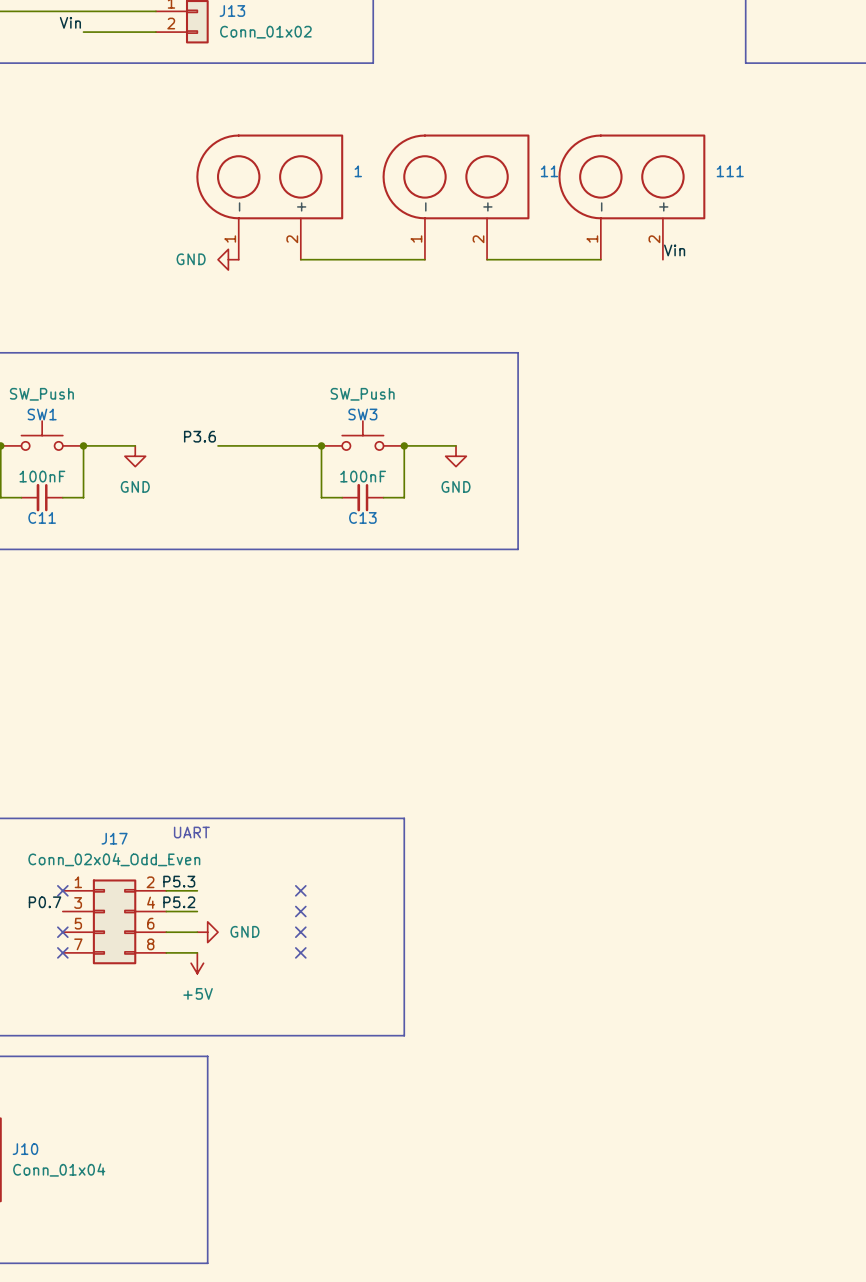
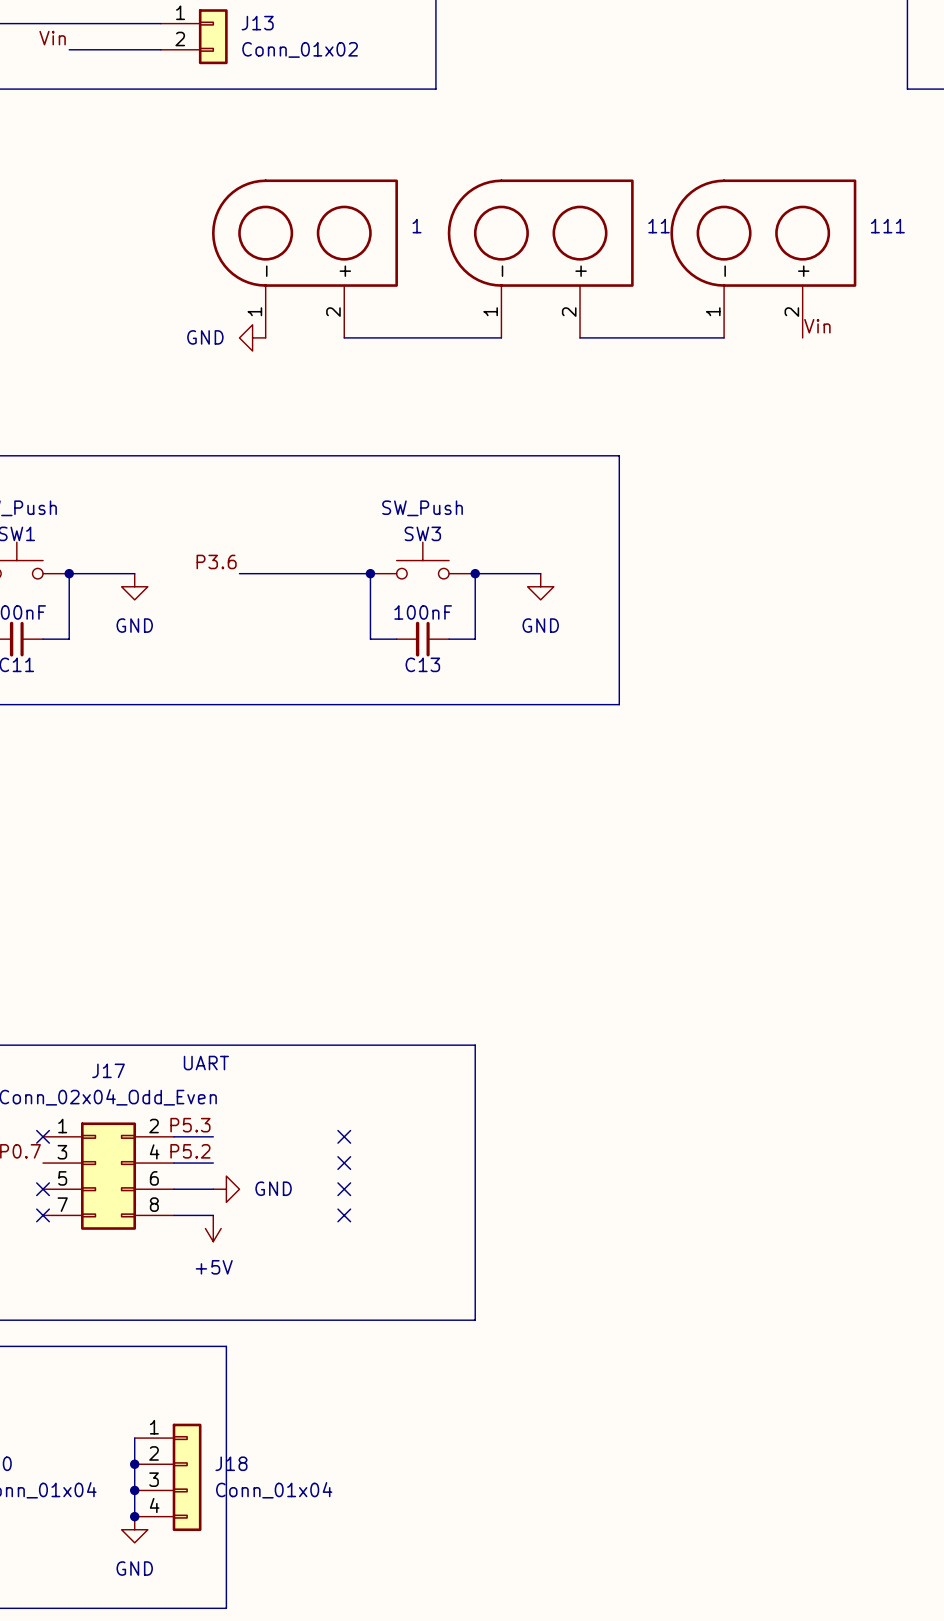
wire: none -> (134, 1438) (134, 1516)
junction: none -> (134, 1464)
J18: none -> Conn_01x04 (168, 1477)
junction: none -> (134, 1490)
junction: none -> (134, 1516)
power symbol: none -> GND (134, 1529)

